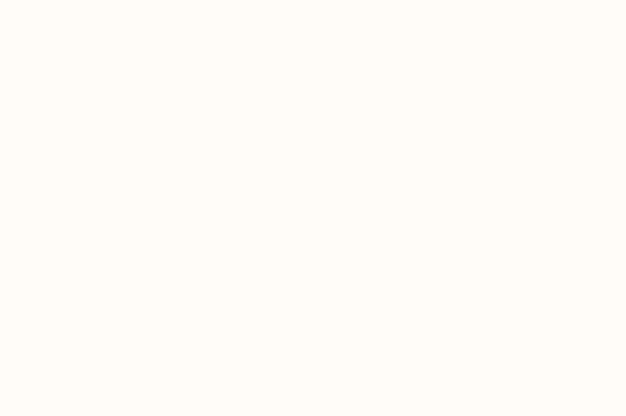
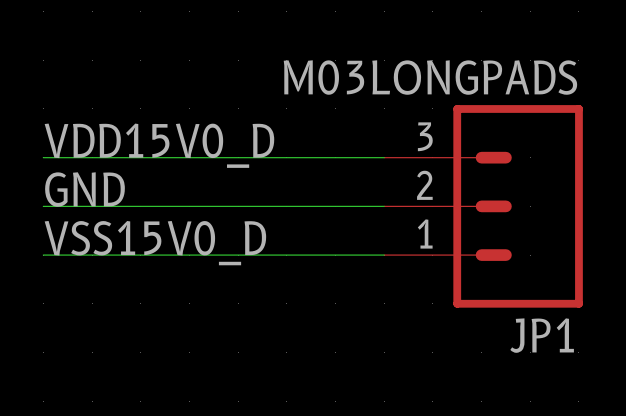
label: none -> VDD15V0_D (159, 145)
wire: none -> (43, 157) (384, 157)
label: none -> GND (84, 189)
wire: none -> (43, 206) (384, 206)
JP1: none -> M03LONGPADS (483, 206)
label: none -> VSS15V0_D (155, 243)
wire: none -> (43, 255) (384, 255)

